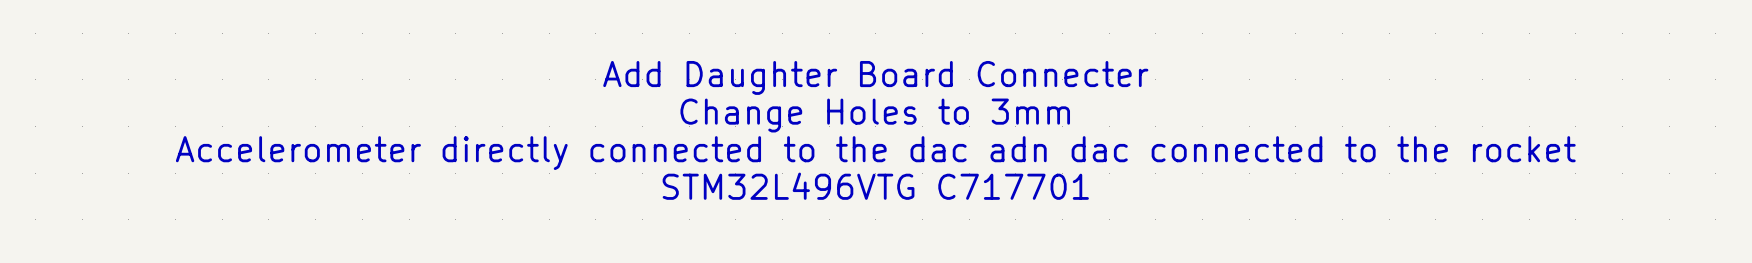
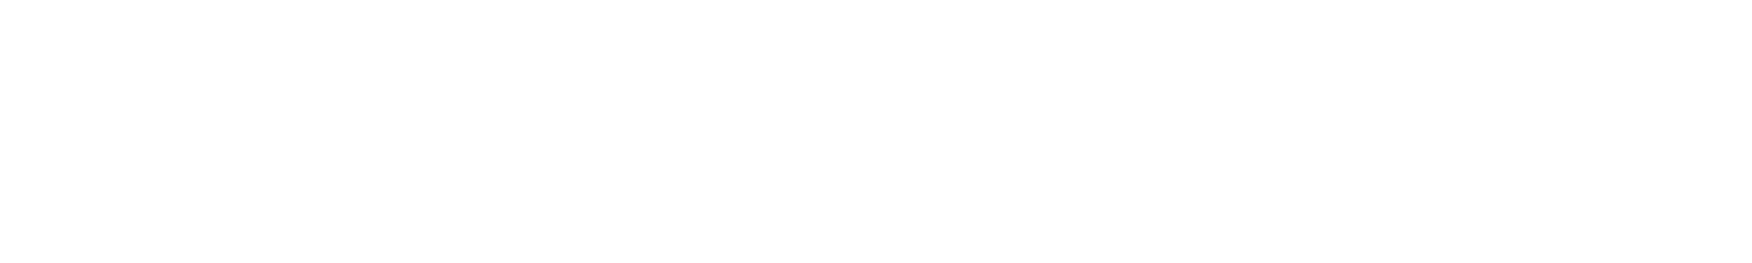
text: Add Daughter Board Connecter (875, 77) -> none
text: Change Holes to 3mm (875, 115) -> none
text: Accelerometer directly connected to the dac adn dac connected to the rocket (875, 153) -> none
text: STM32L496VTG C717701 (875, 186) -> none

